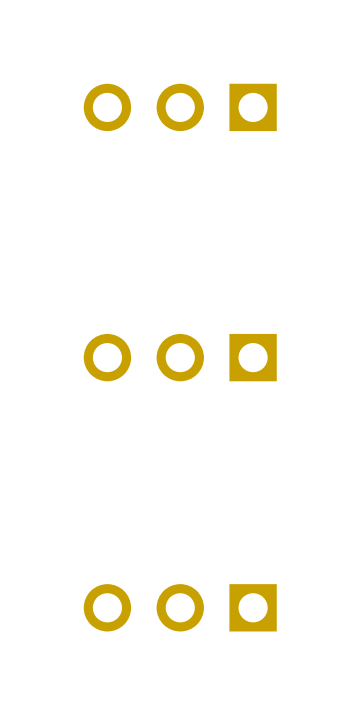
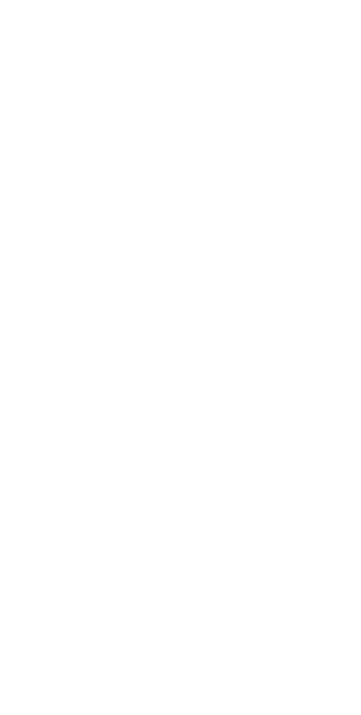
part: (180, 107) -> none
part: (180, 357) -> none
part: (180, 607) -> none

